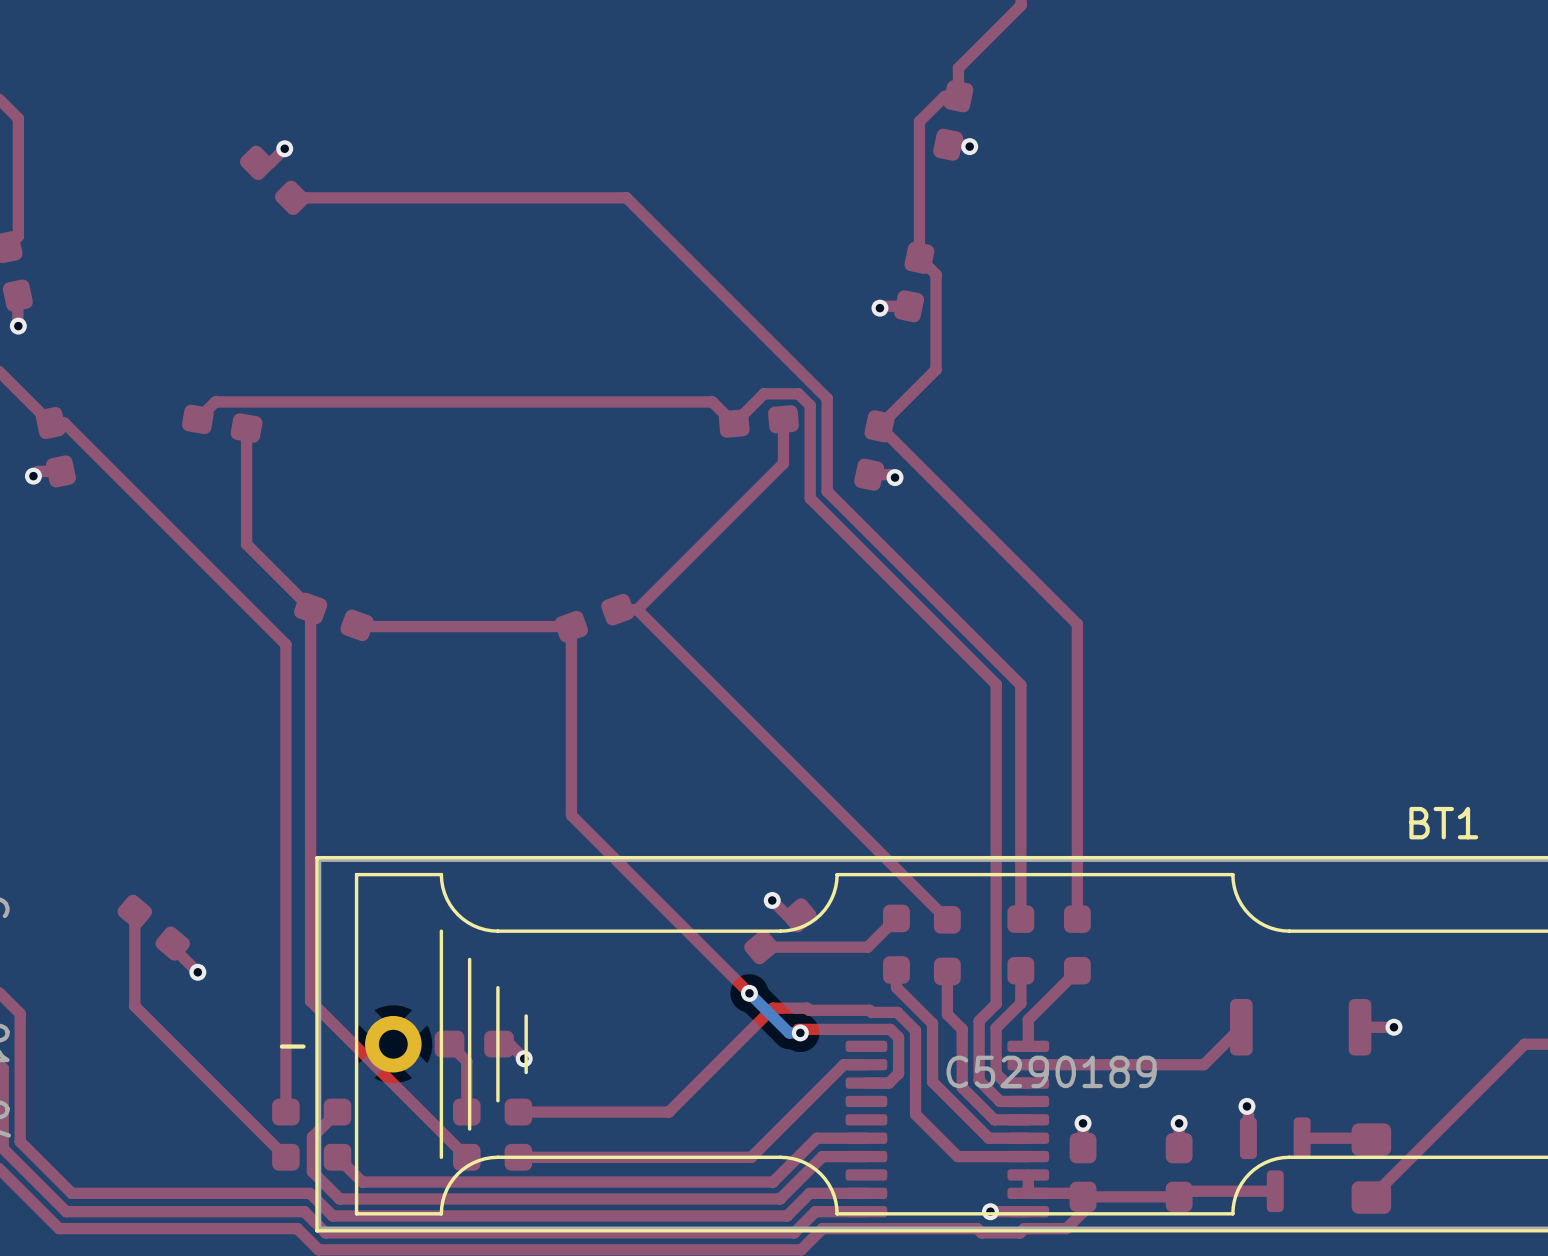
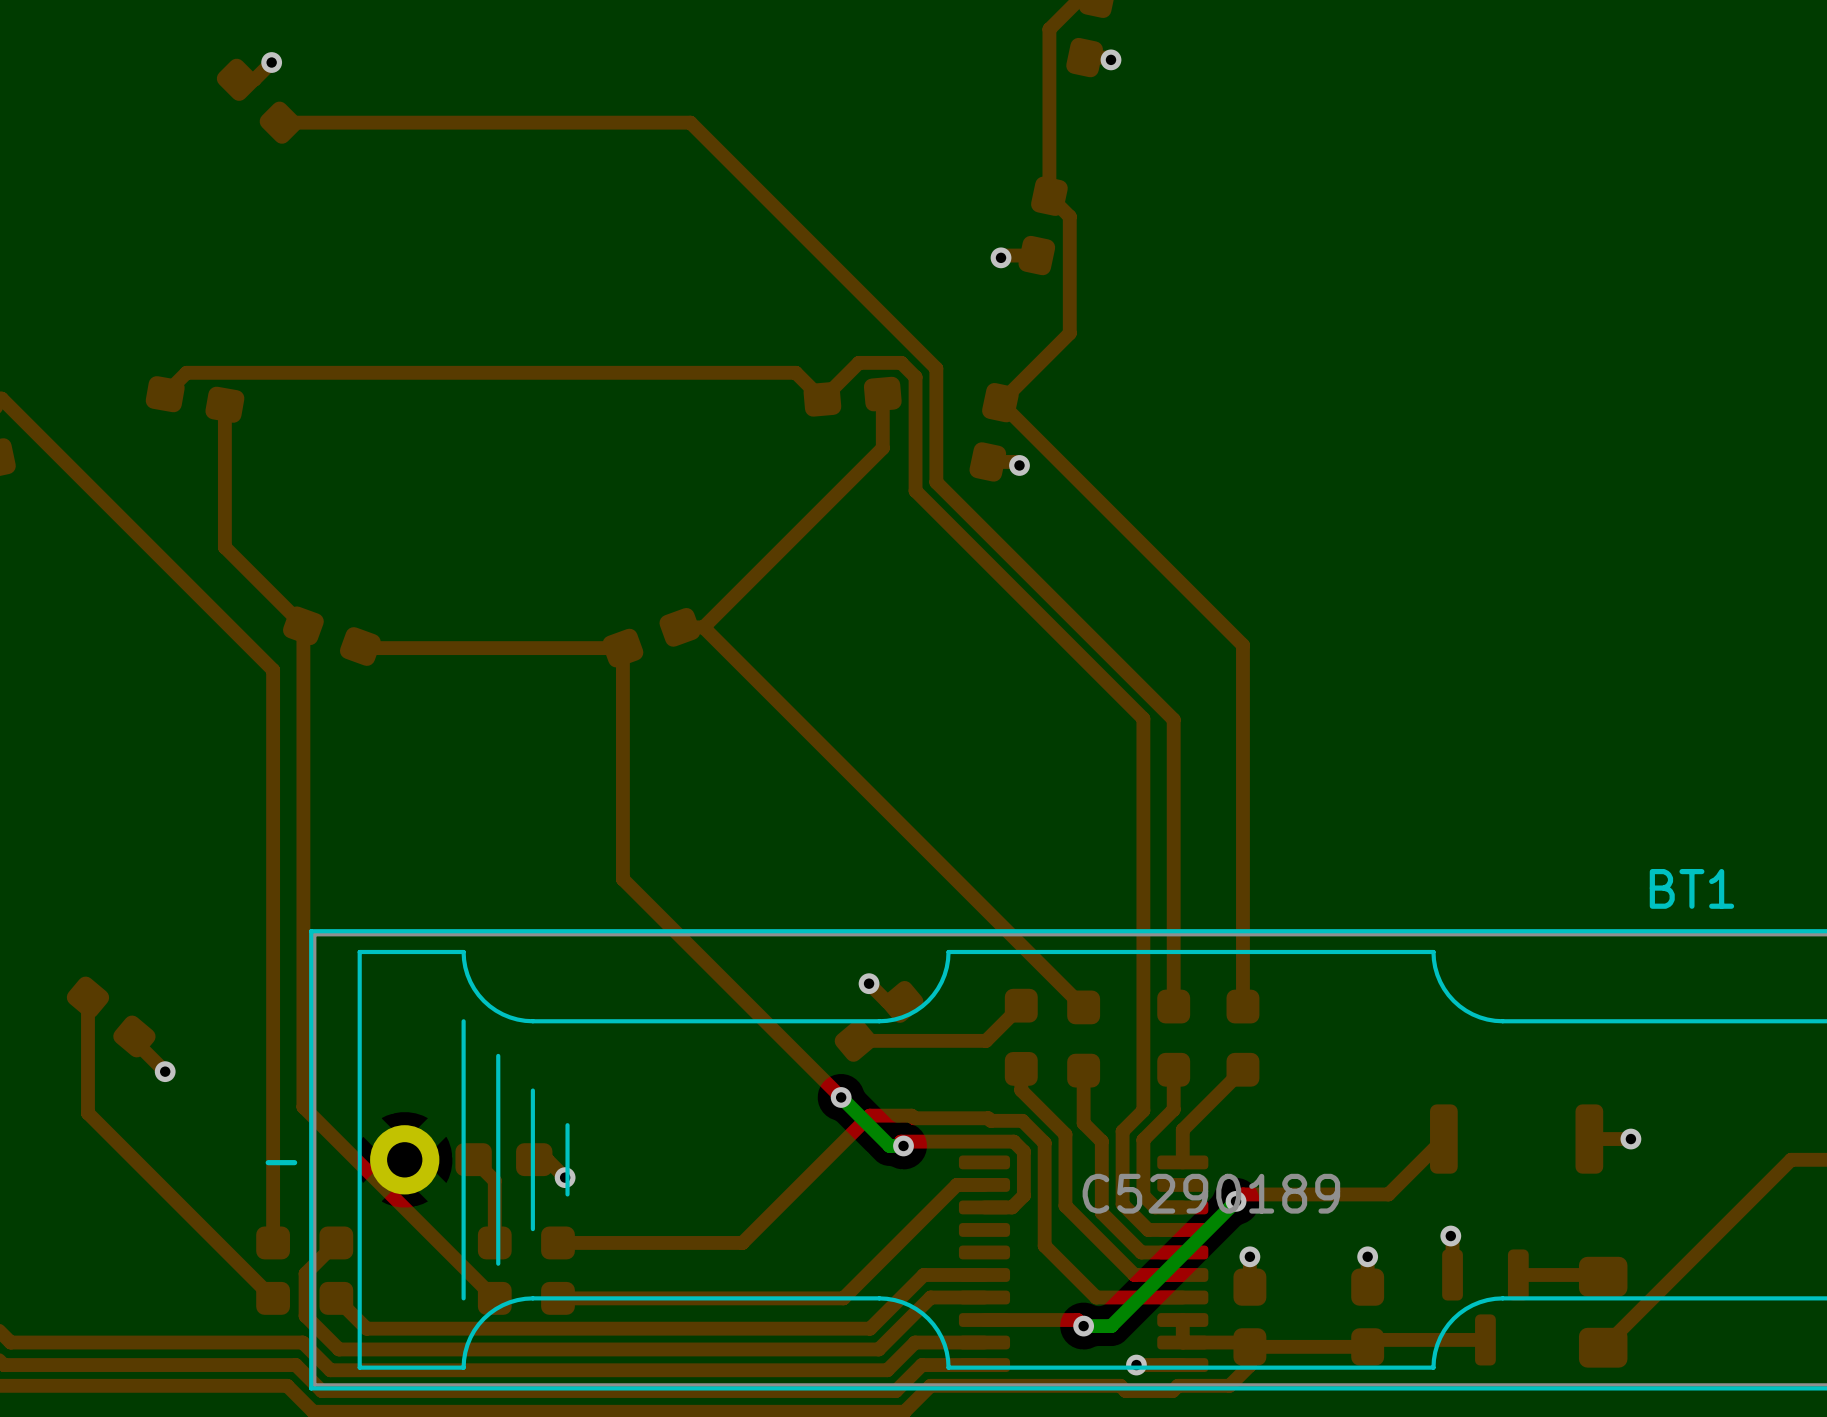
top track: (1203, 1064) (1028, 1064) -> (1397, 1184) (1388, 1194) (1242, 1194) (1236, 1201)
bottom track: none -> (1236, 1201) (1111, 1326) (1083, 1326)
via: none -> (1236, 1201)
top track: none -> (984, 1320) (1077, 1320) (1083, 1326)
via: none -> (1083, 1326)

